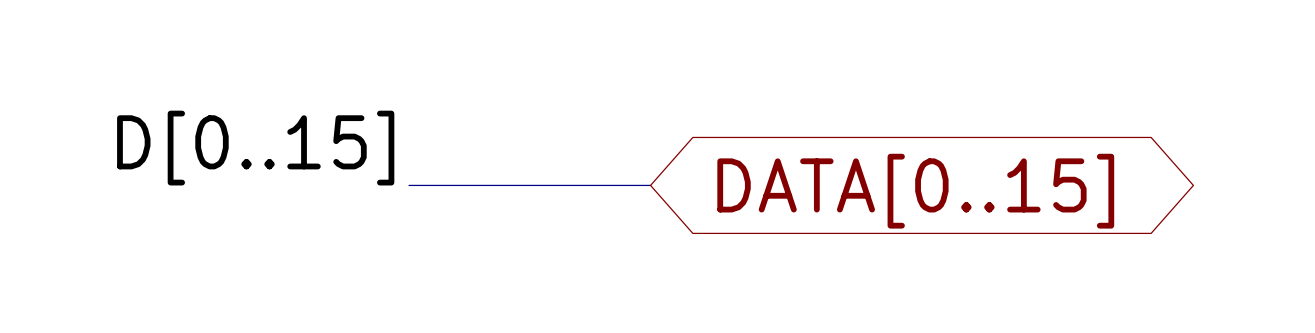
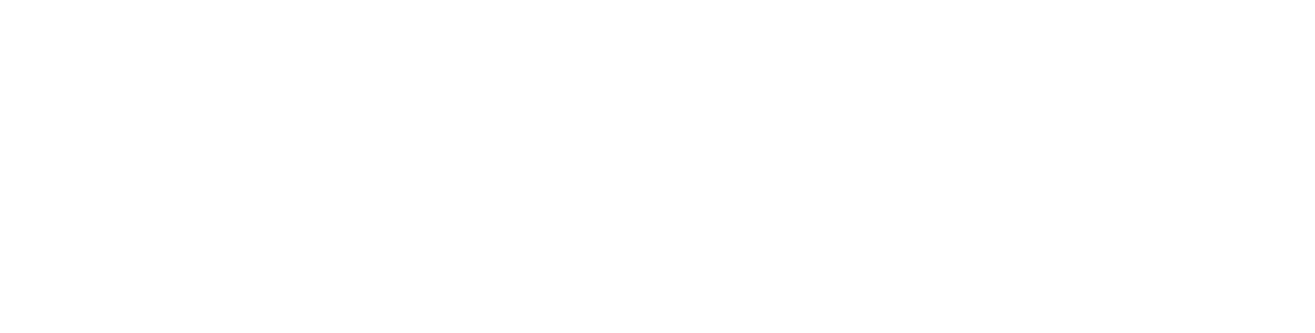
label: D[0..15] (255, 148) -> none
bus: (409, 185) (650, 185) -> none
global label: DATA[0..15] (915, 191) -> none

